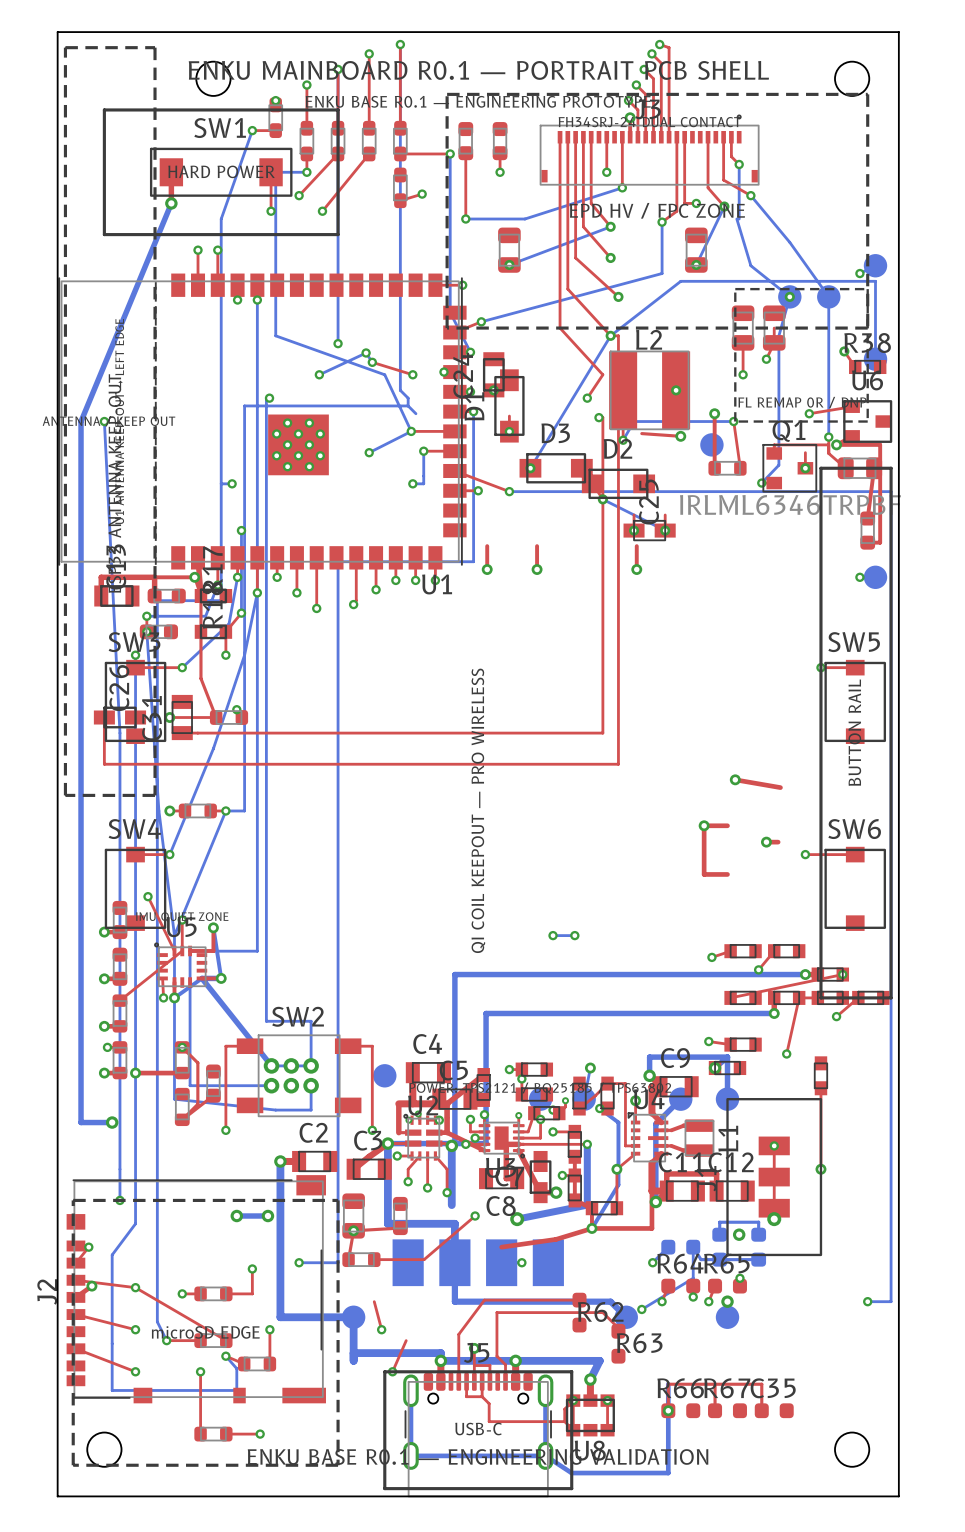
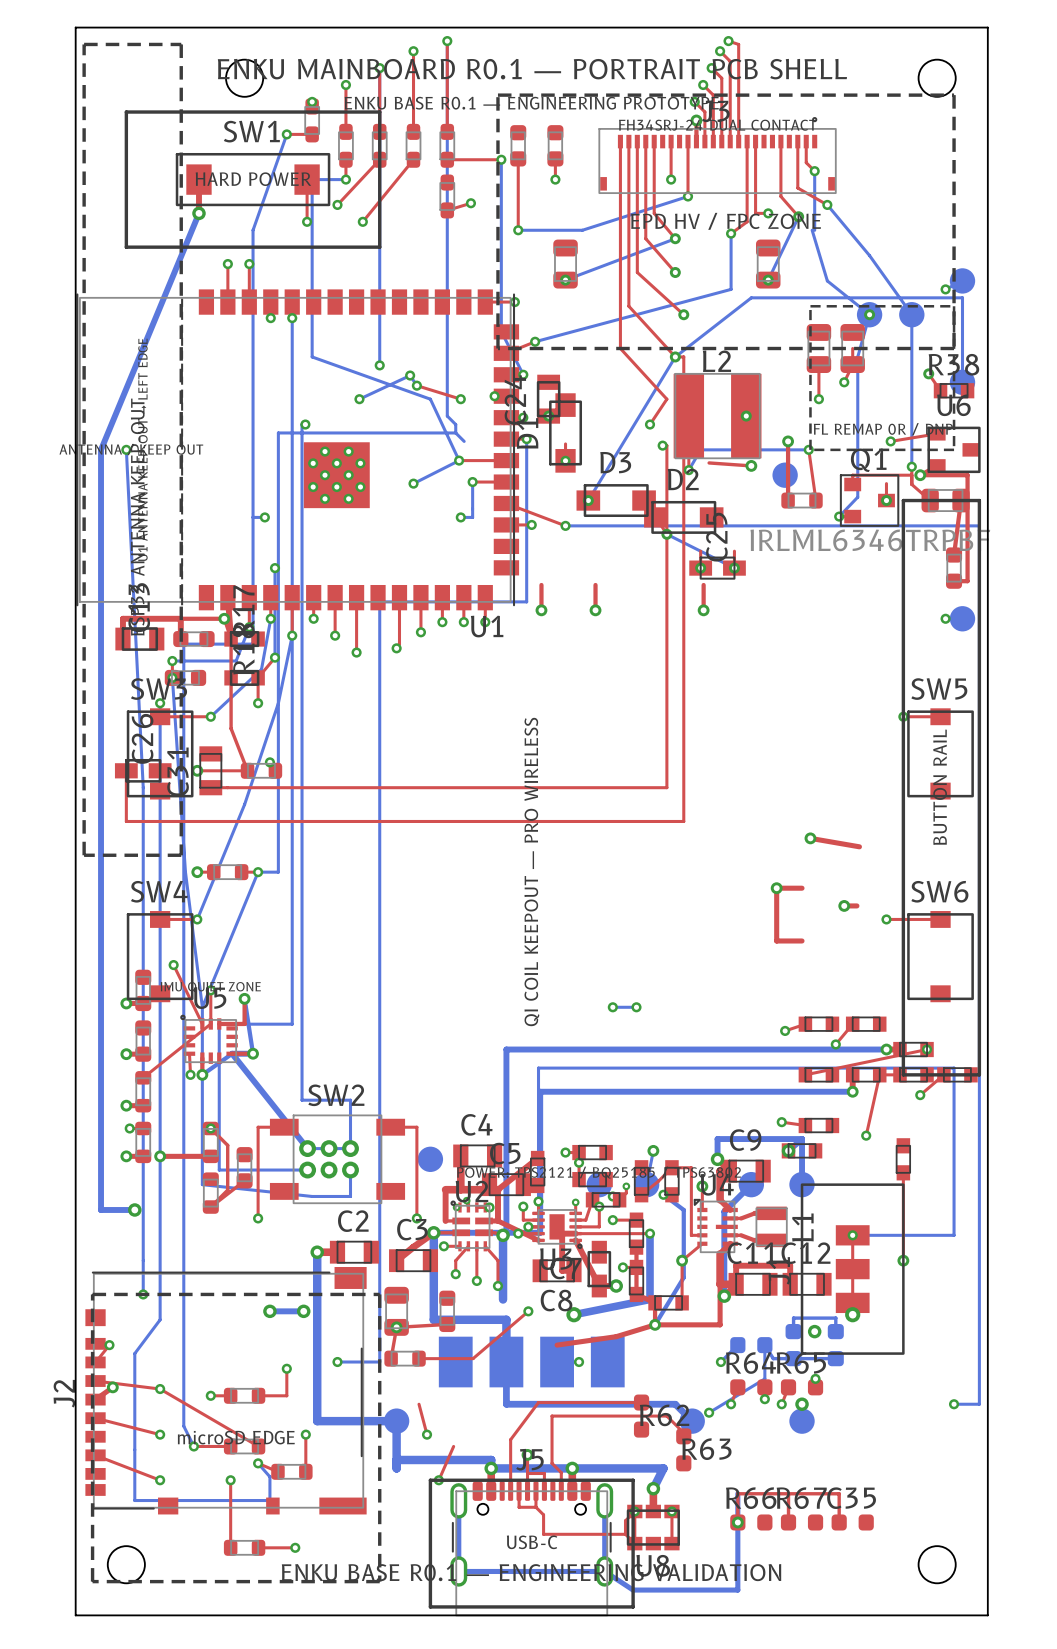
bottom track: none -> (538, 1201) (538, 1068) (954, 1068) (954, 1235) (852, 1235)

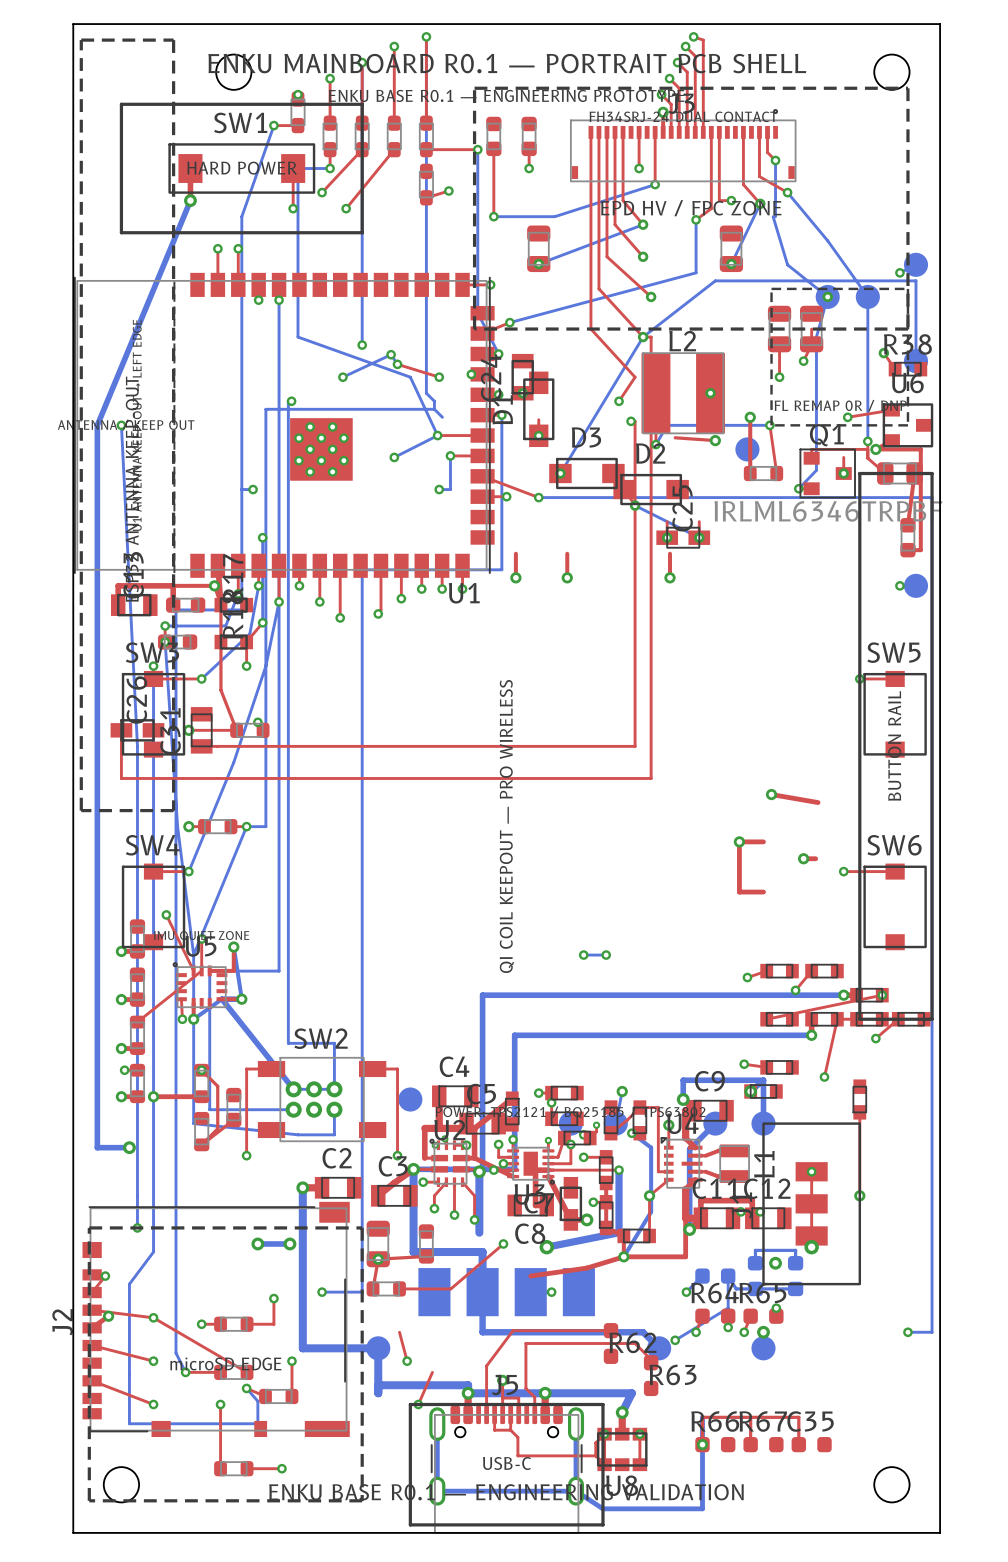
bottom track: (538, 1201) (538, 1068) (954, 1068) (954, 1235) (852, 1235) -> none
via: none -> (741, 1211)
via: none -> (760, 1211)

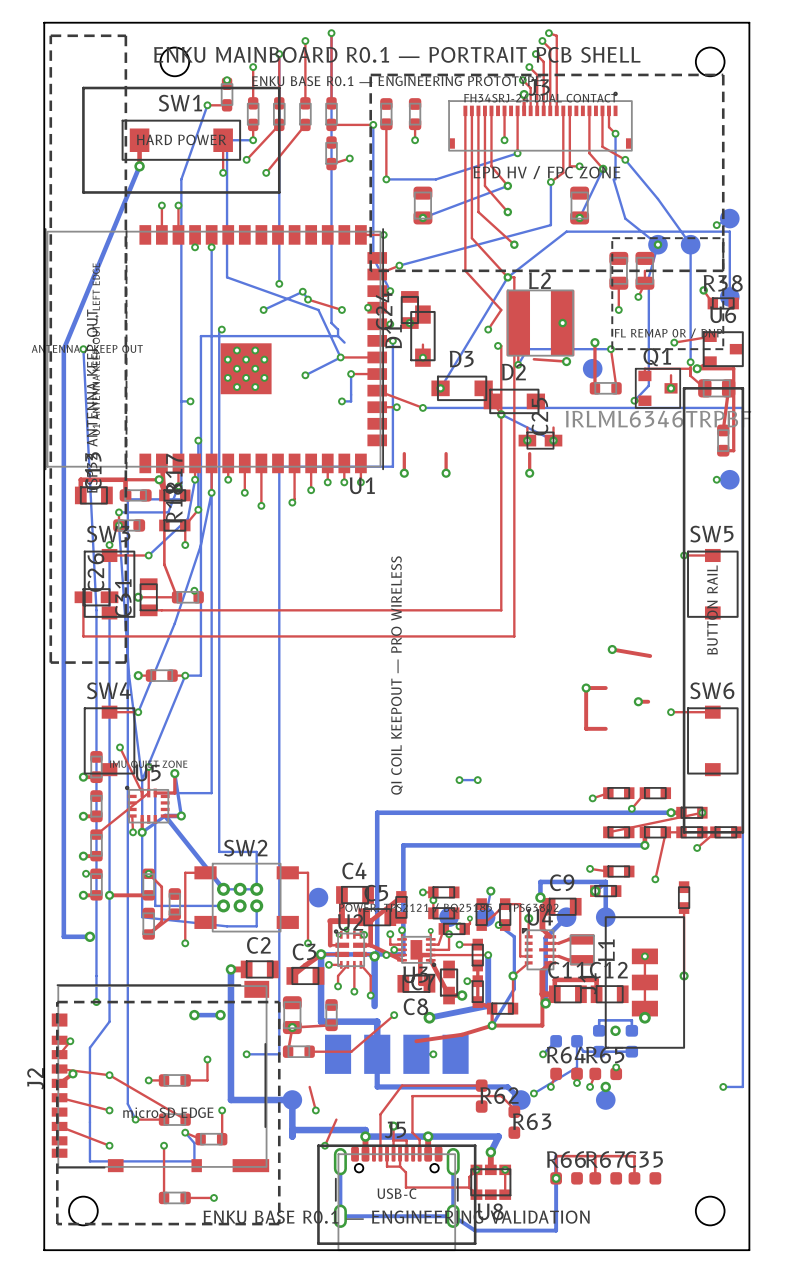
via: (741, 1211) -> none
via: (760, 1211) -> none

